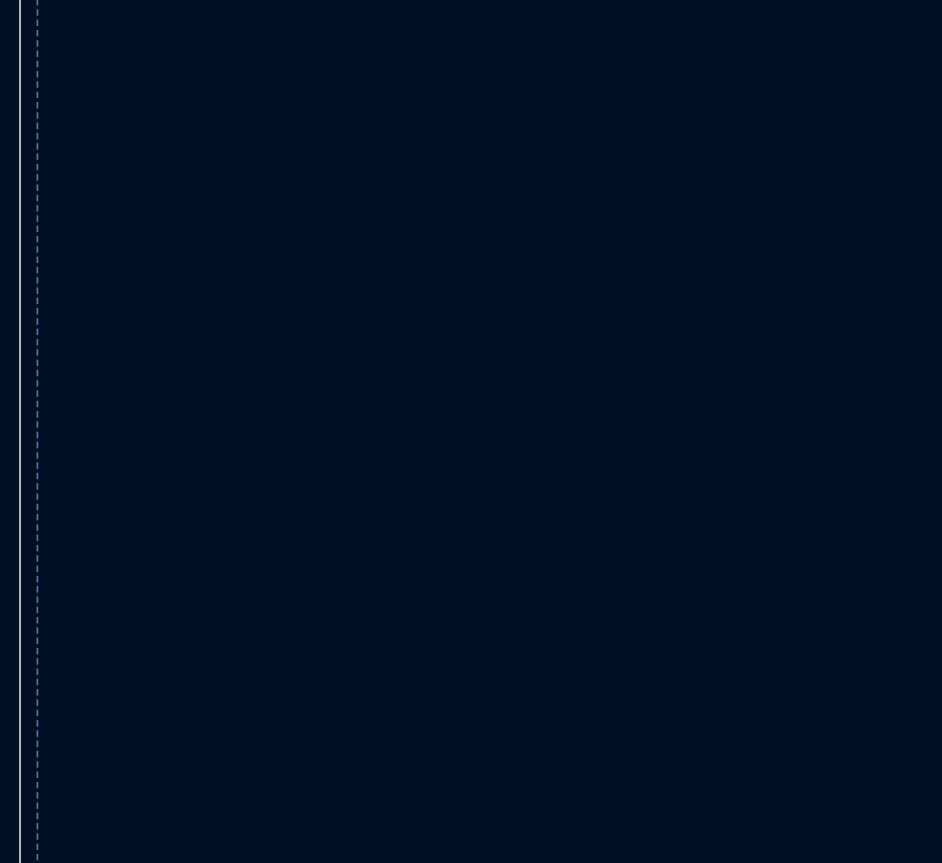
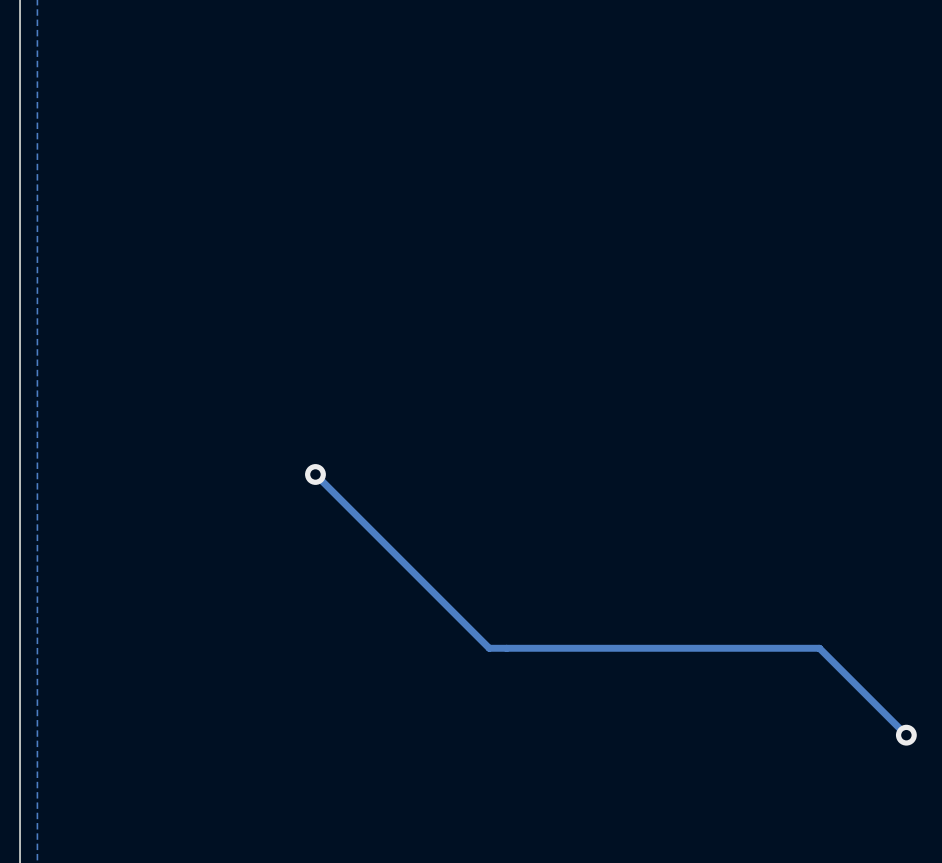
track: none -> (315, 474) (489, 648) (819, 648) (906, 735)
via: none -> (315, 474)
via: none -> (906, 735)

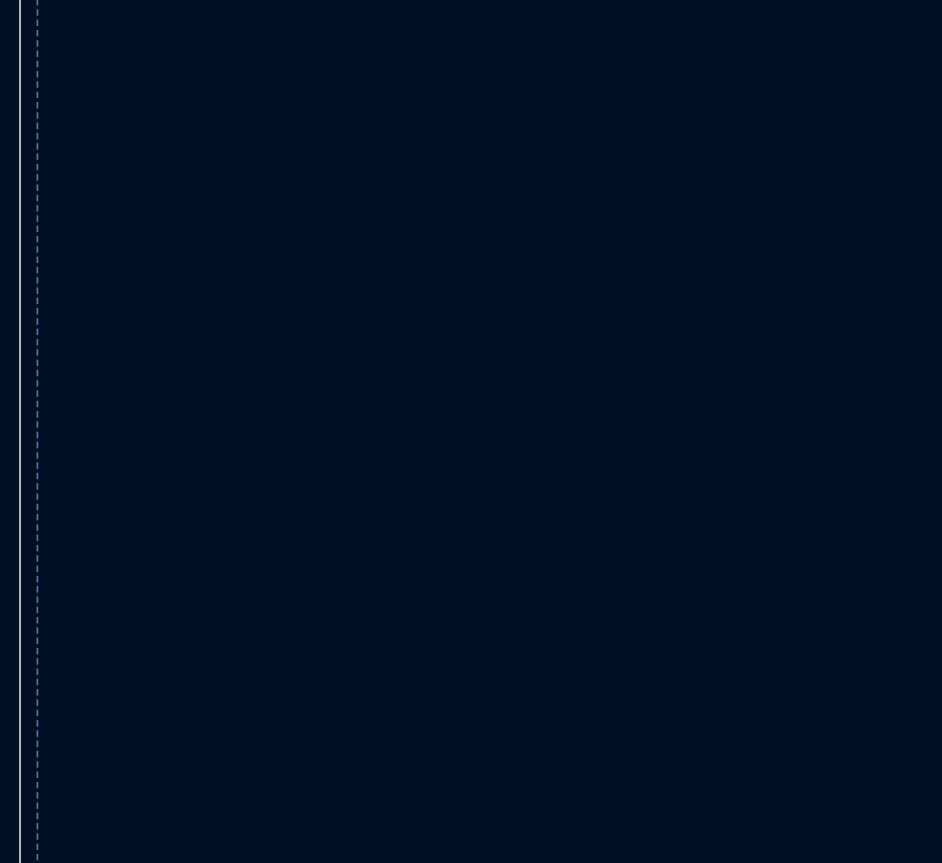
track: (315, 474) (489, 648) (819, 648) (906, 735) -> none
via: (315, 474) -> none
via: (906, 735) -> none

